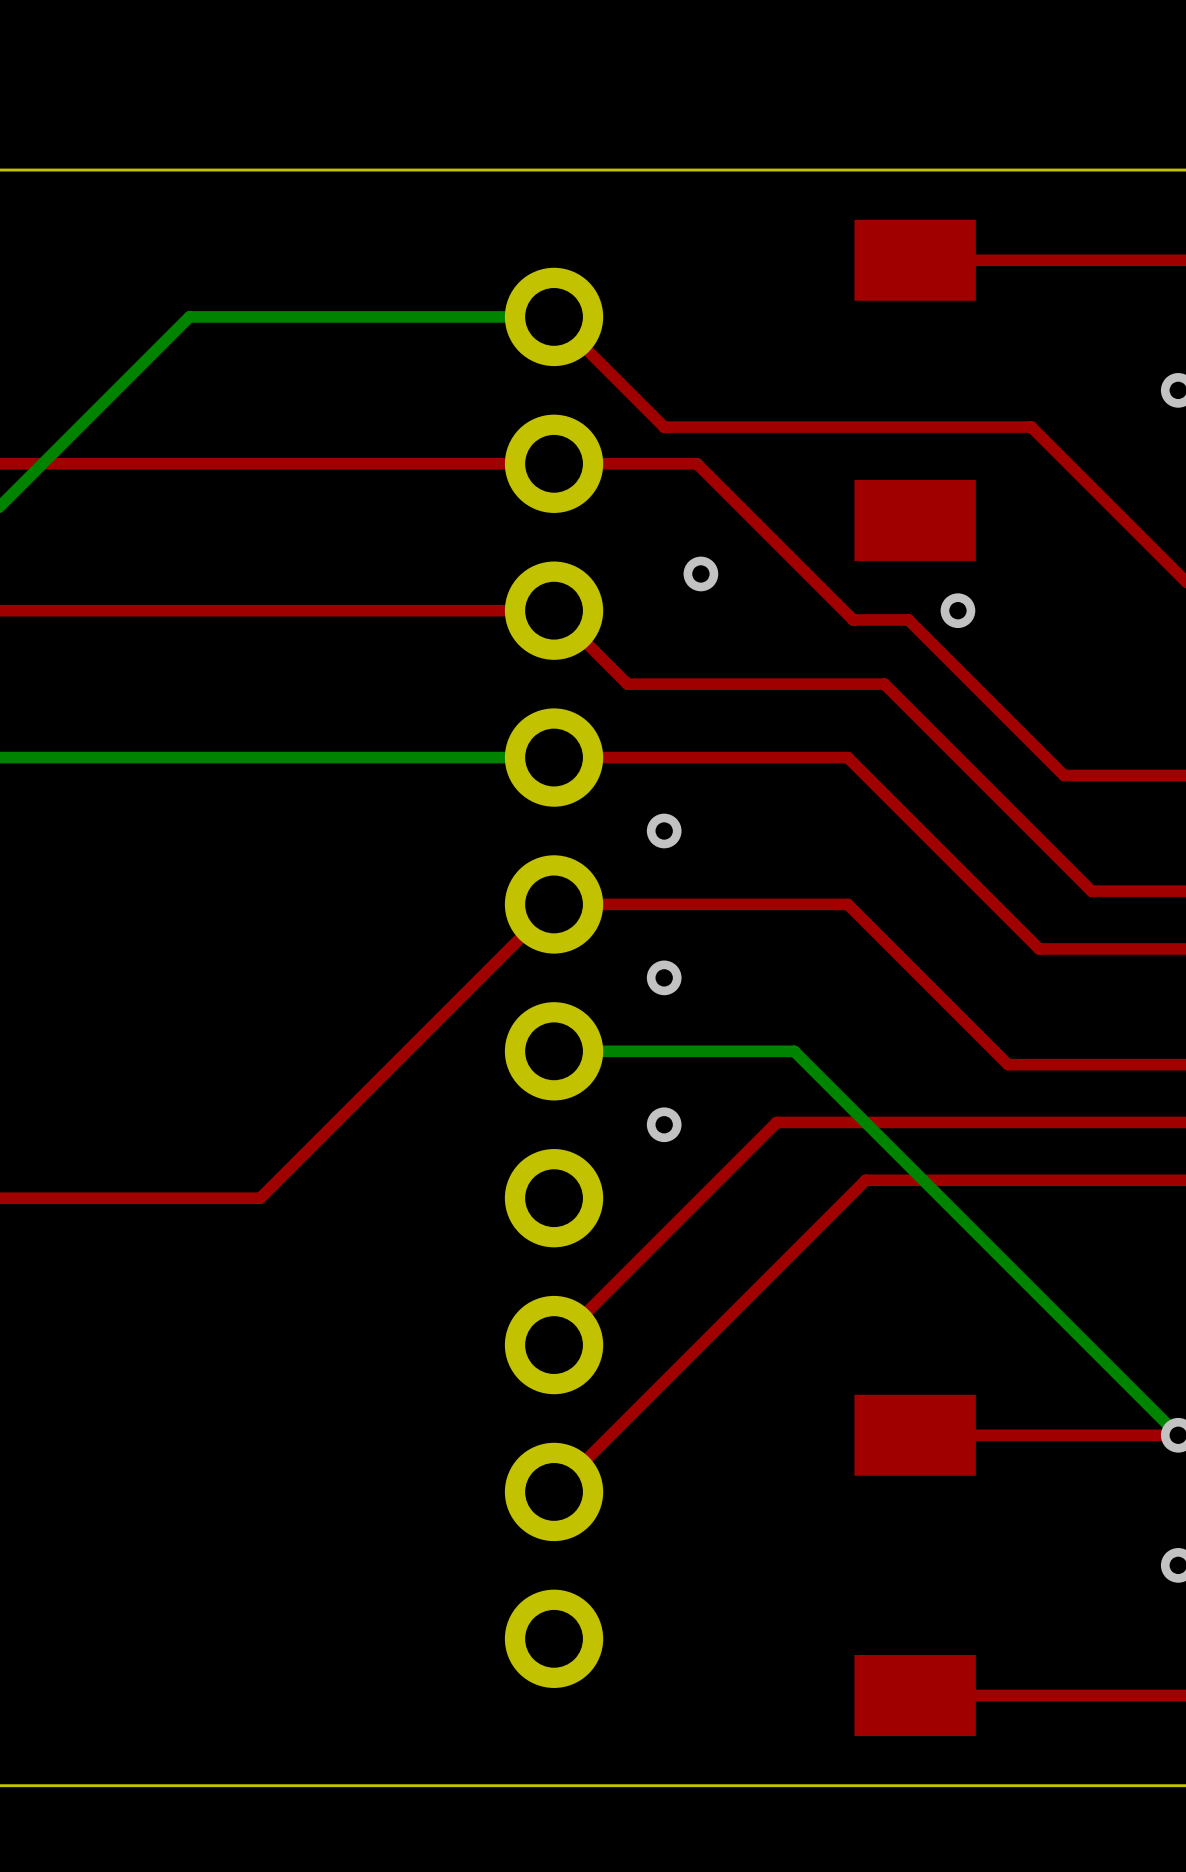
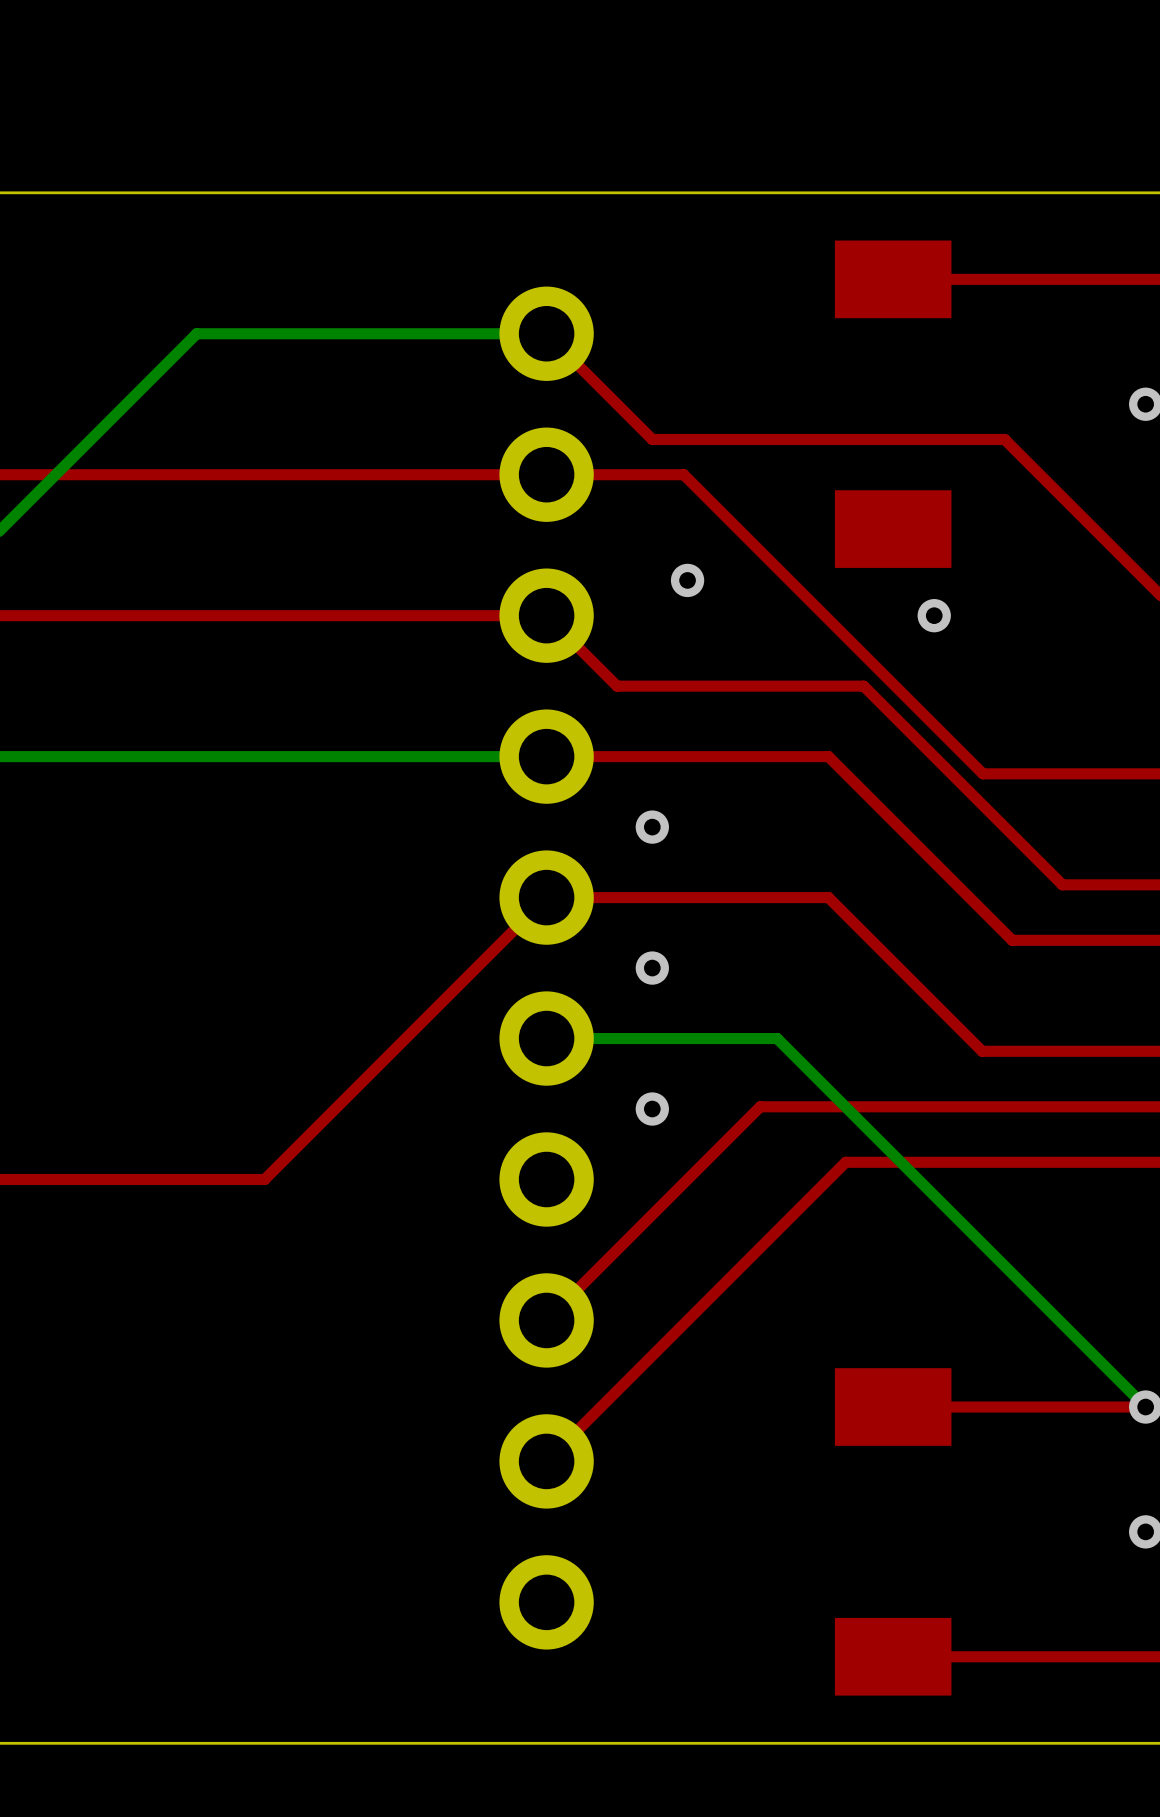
top track: (853, 619) (908, 619) (1063, 775) -> (833, 624) (982, 773) (1036, 773)

